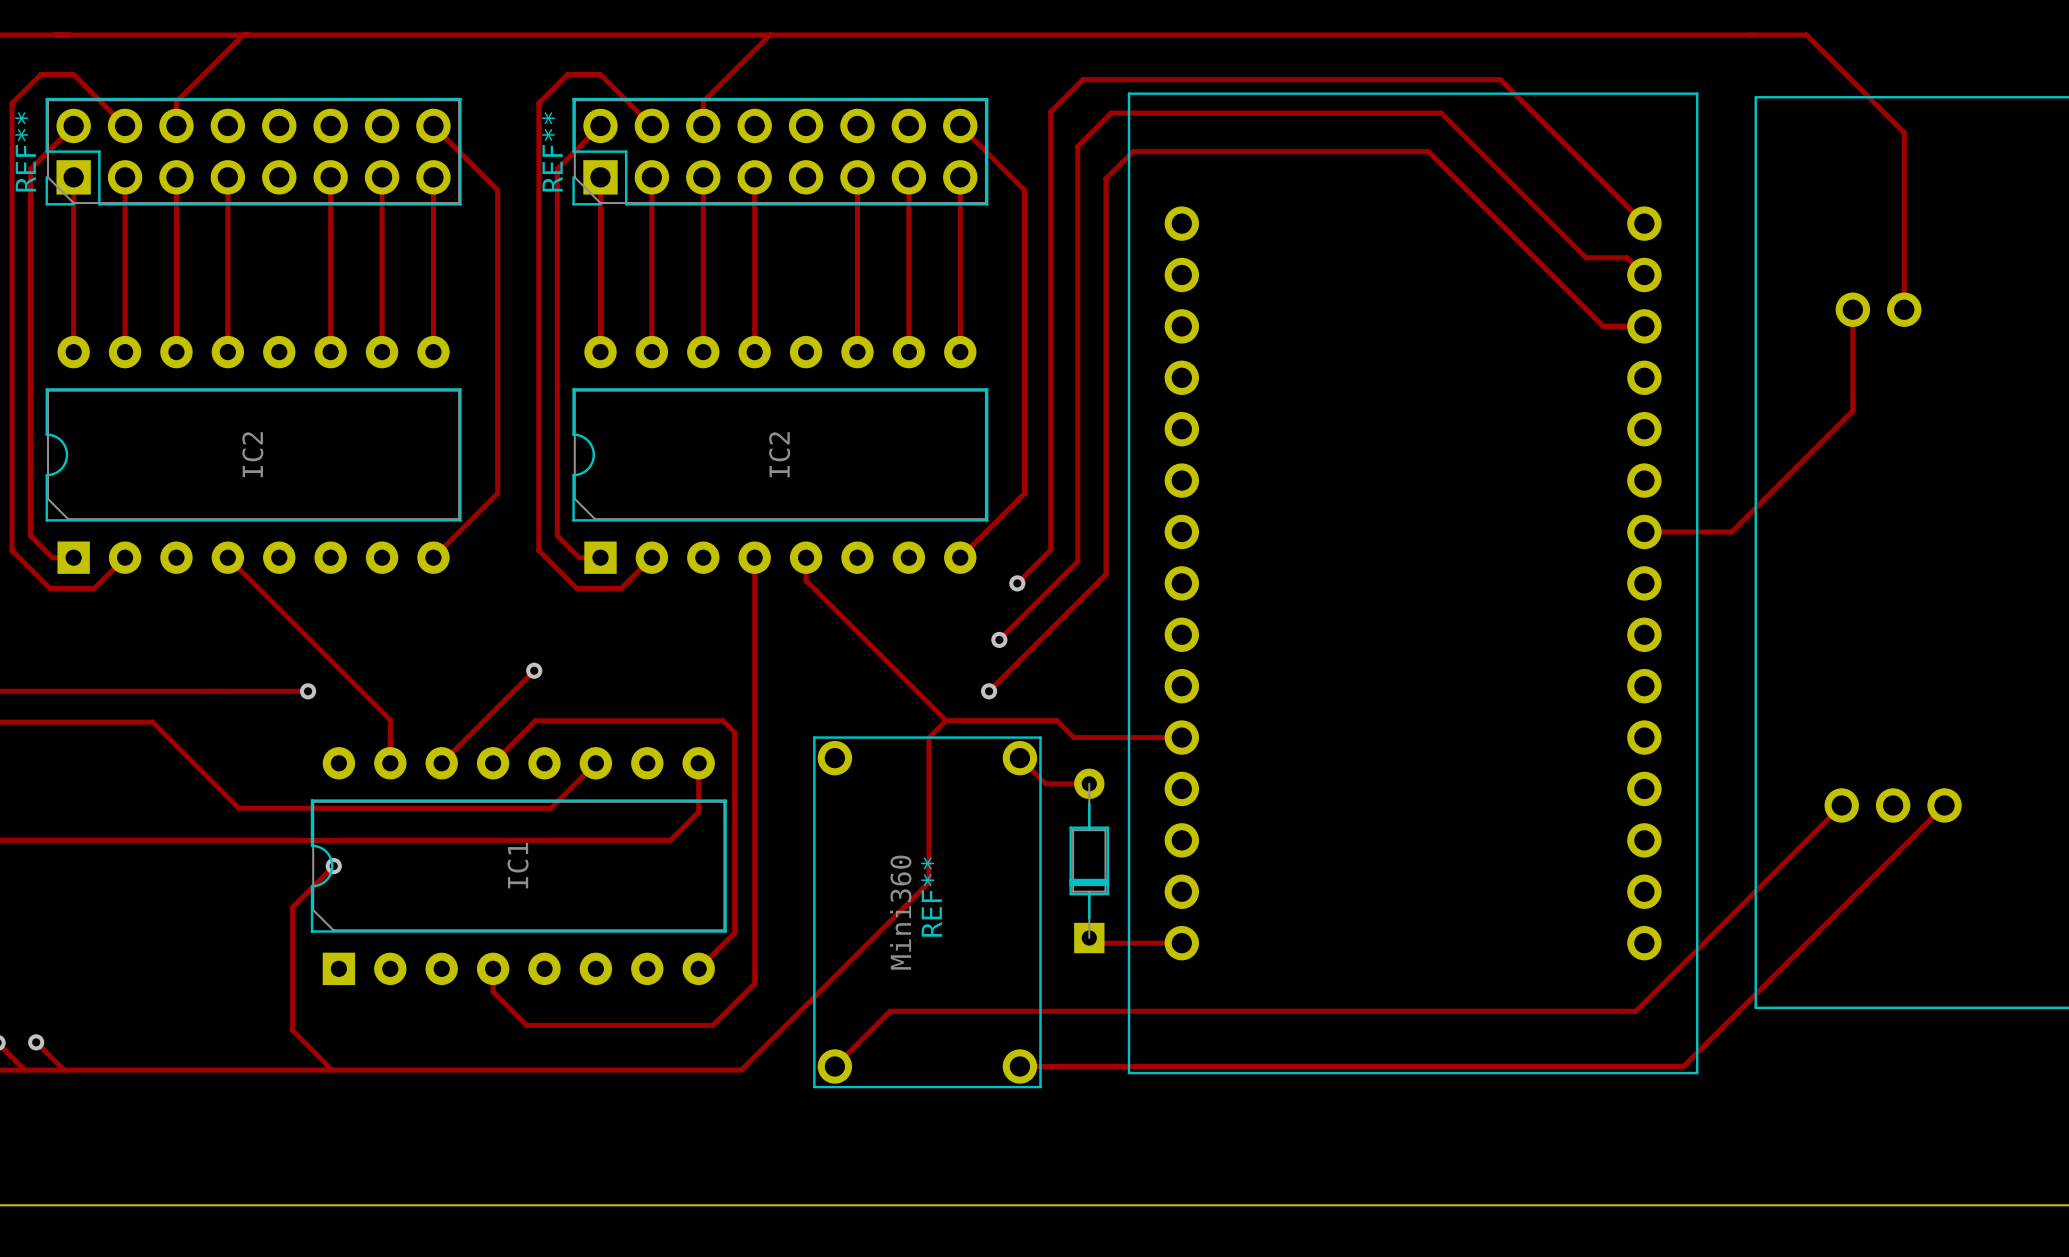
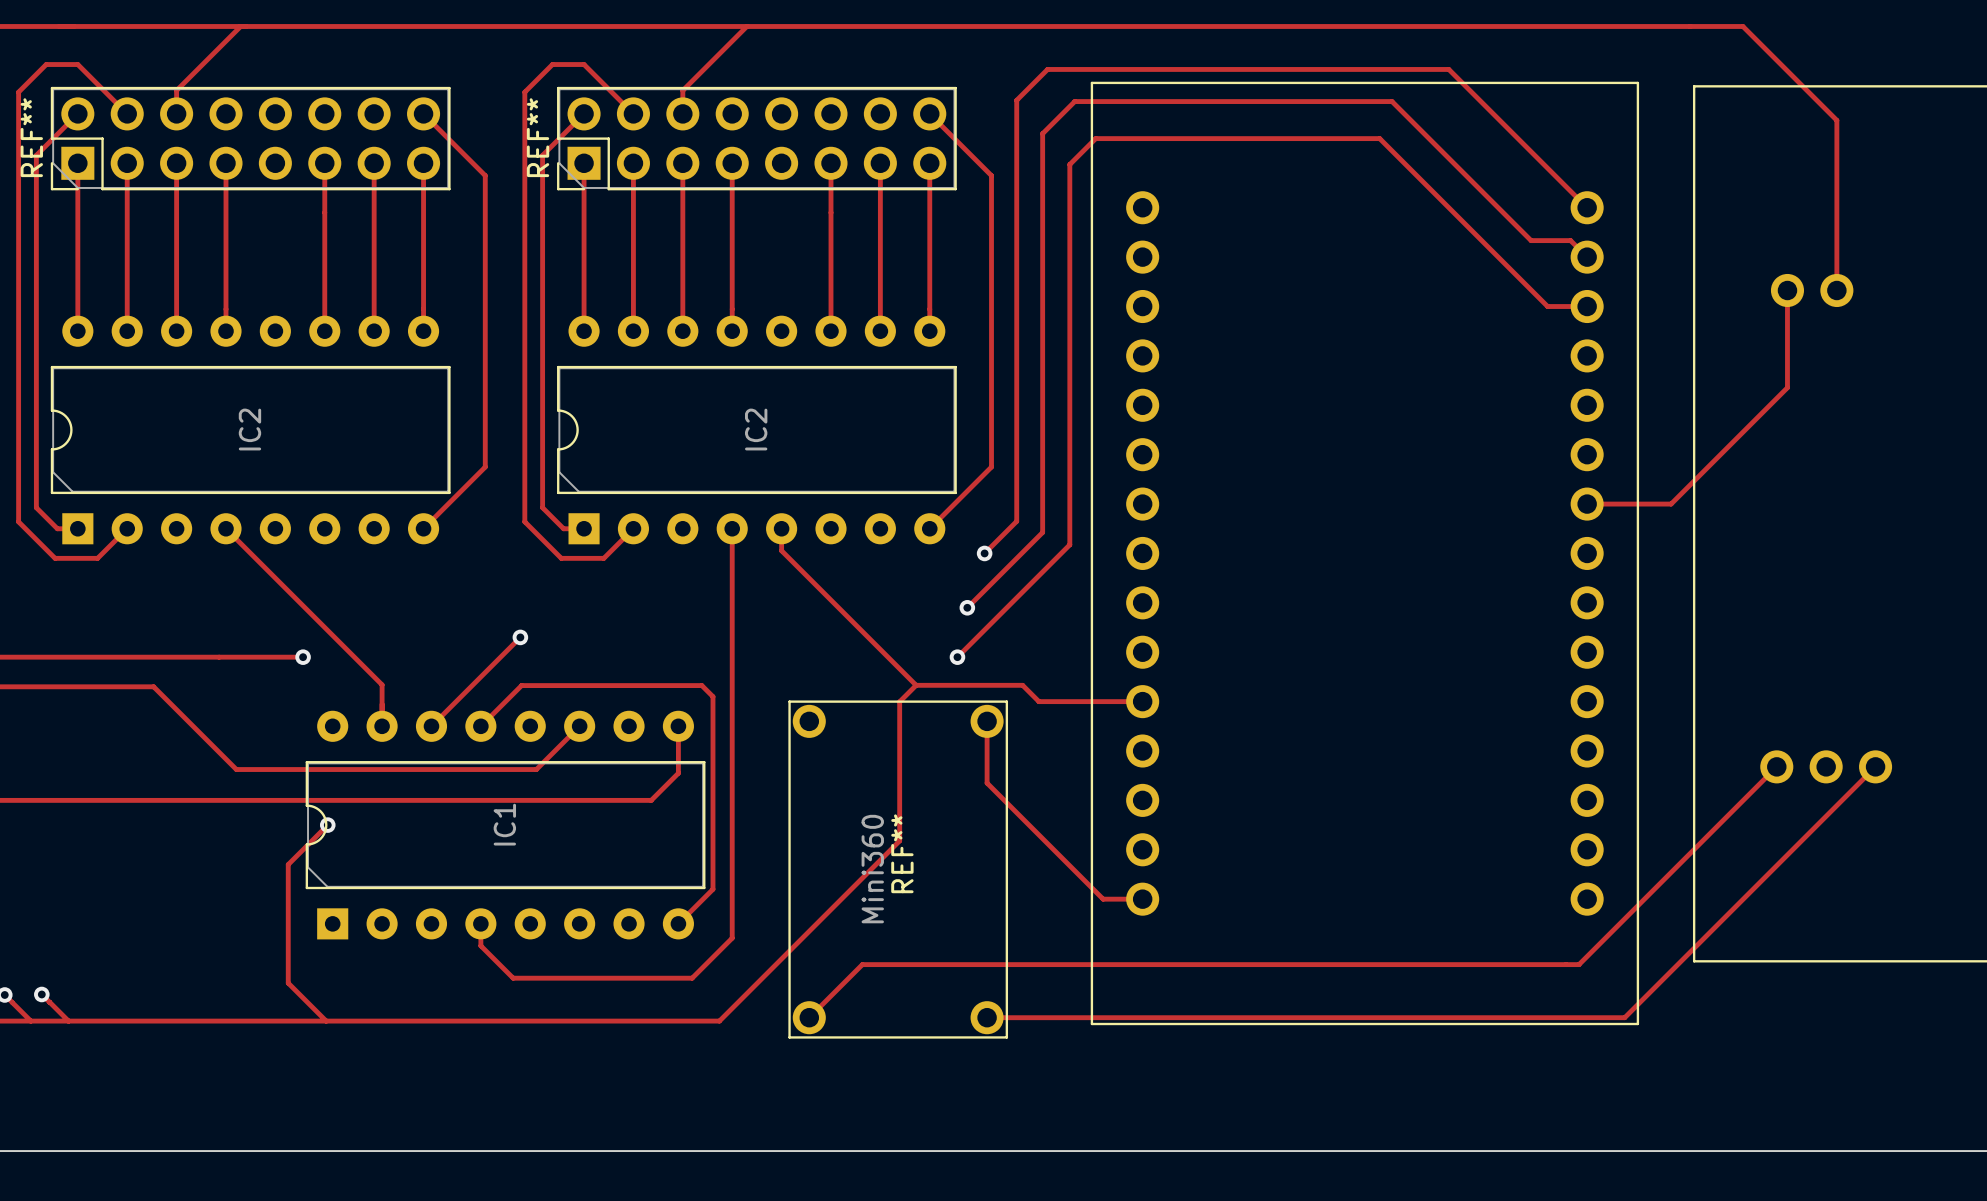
track: (1019, 758) (1045, 783) (1089, 783) -> (987, 721) (987, 783) (1103, 899)
part: (1089, 860) -> none
track: (1089, 938) (1094, 943) (1140, 943) -> none

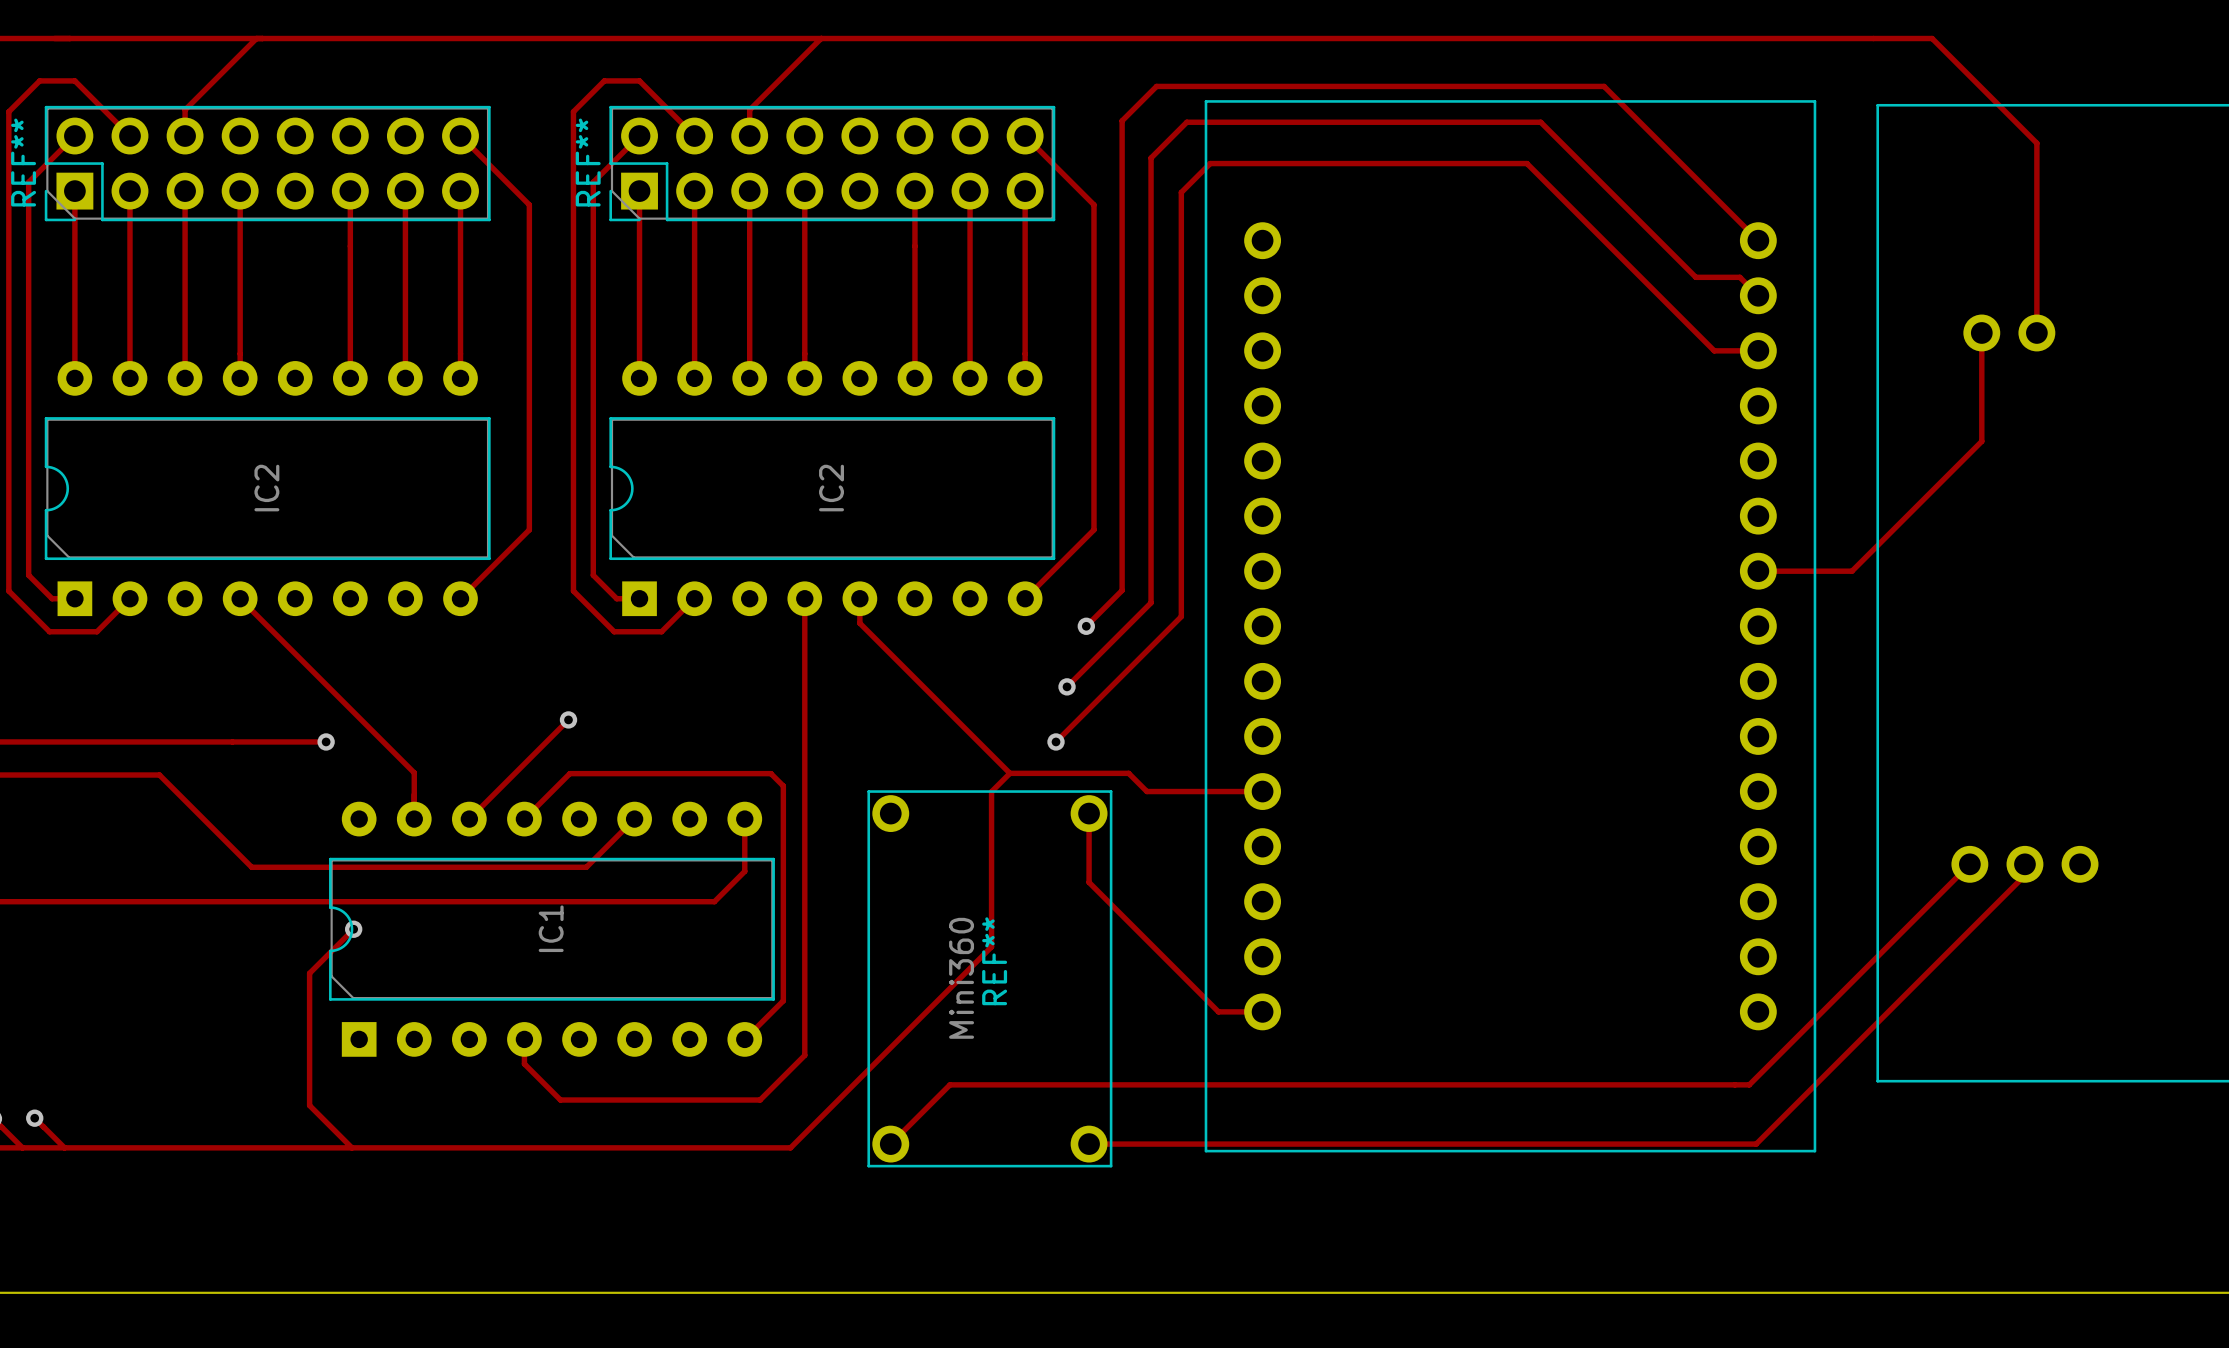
track: (1875, 766) (1624, 1017) (1585, 1017) -> (2035, 864) (1756, 1144)

